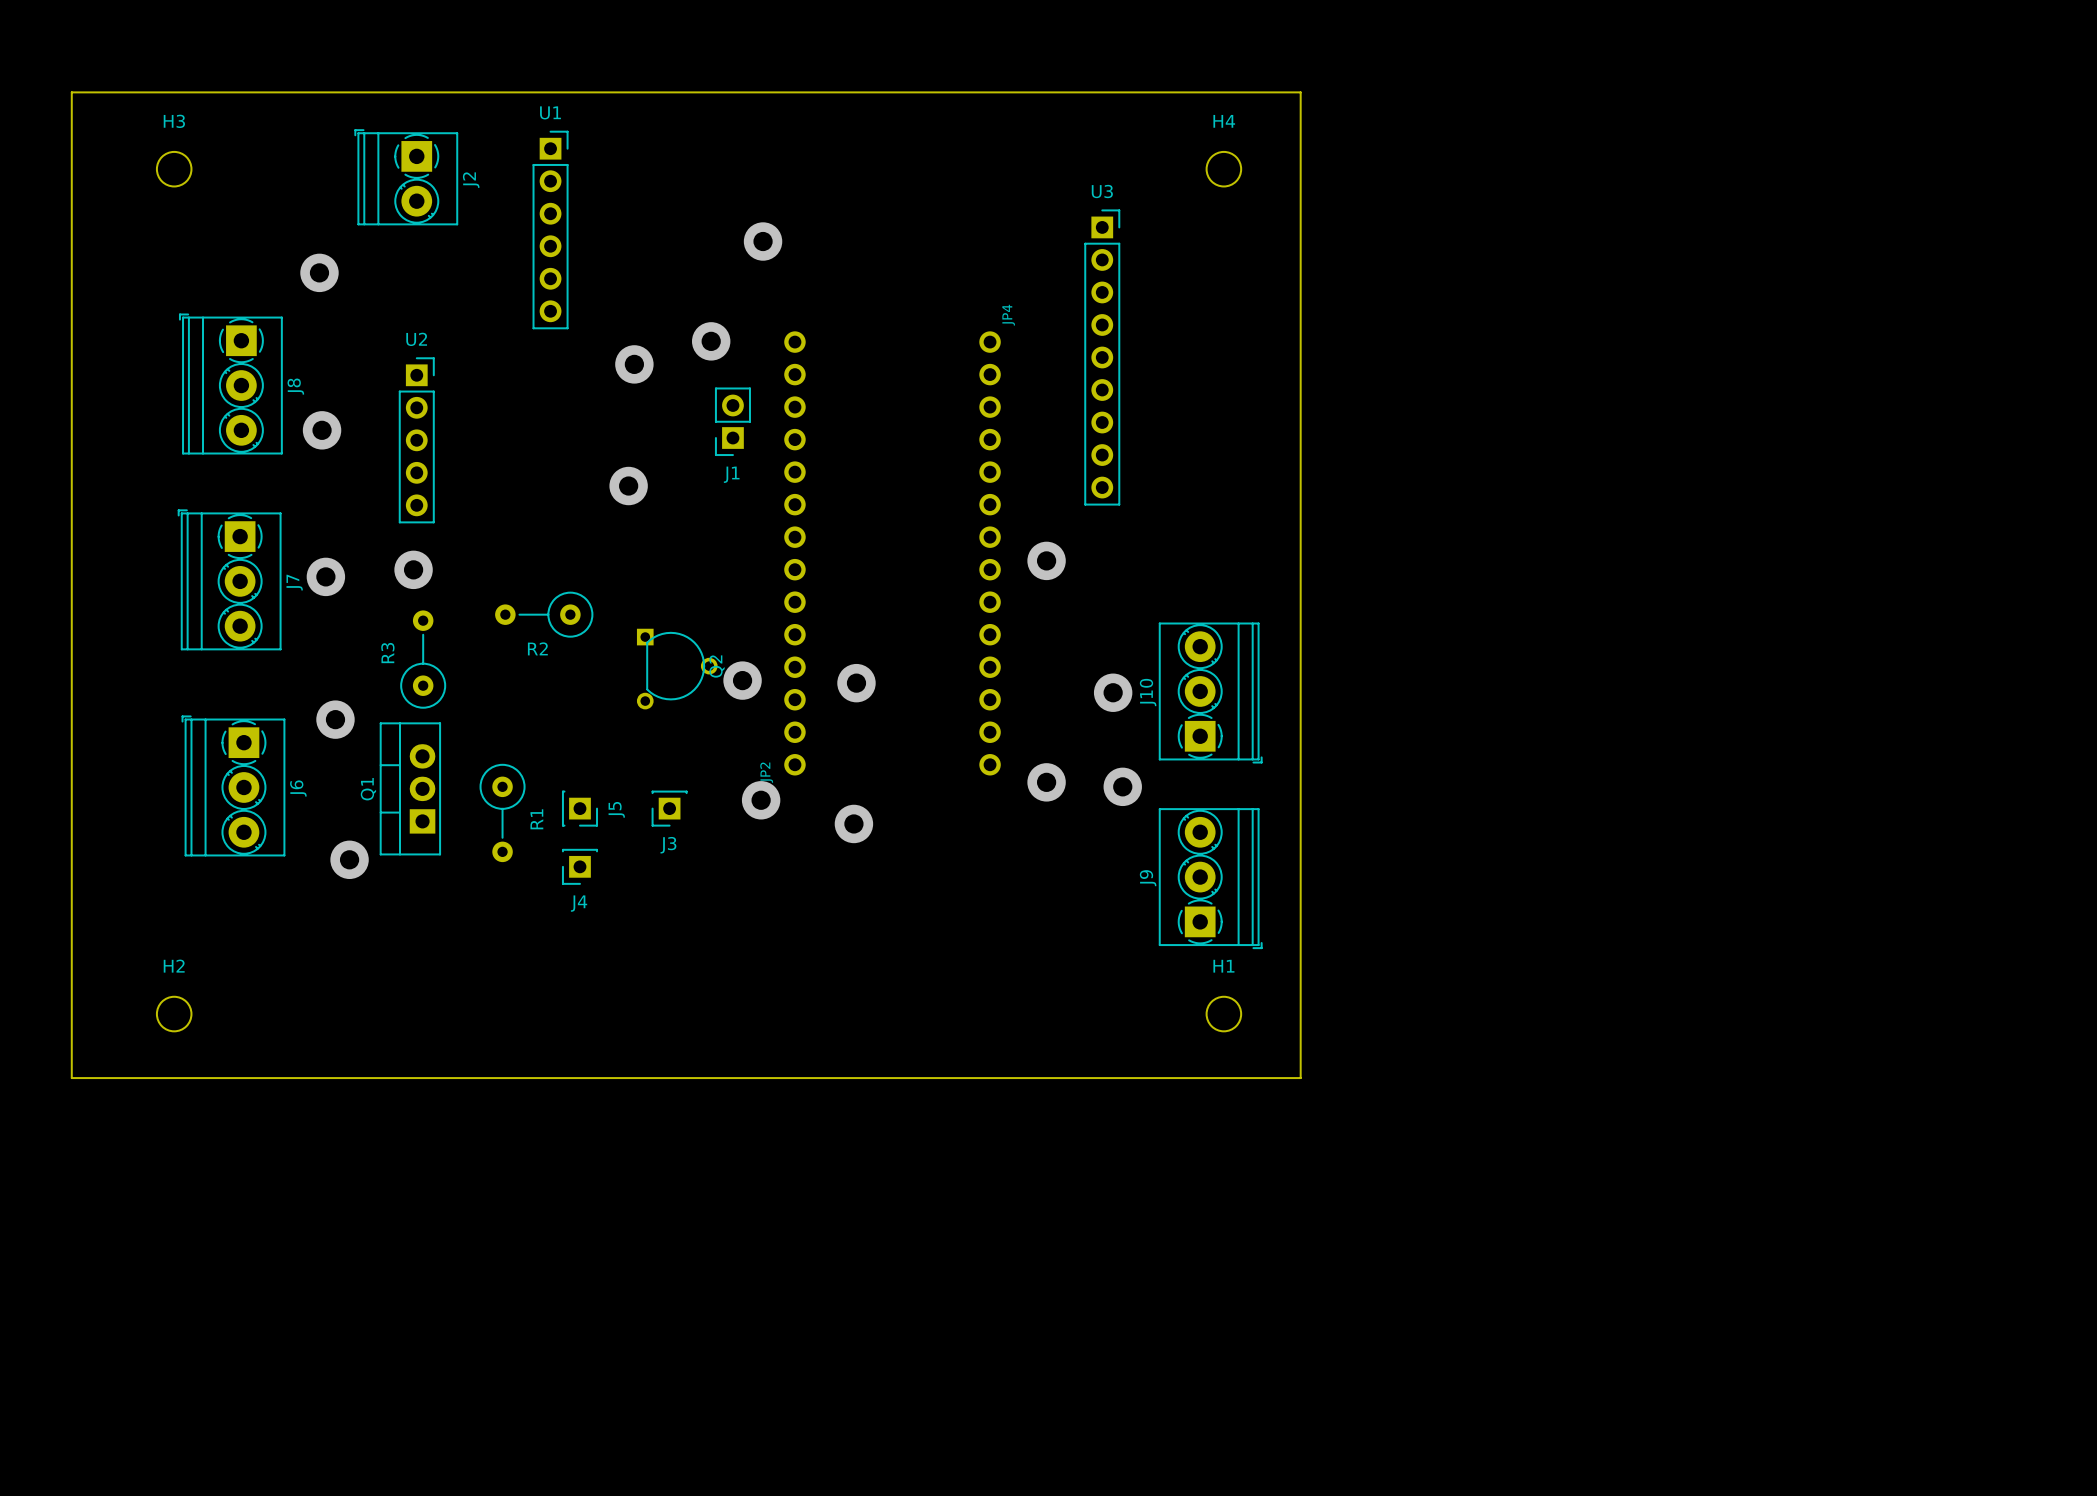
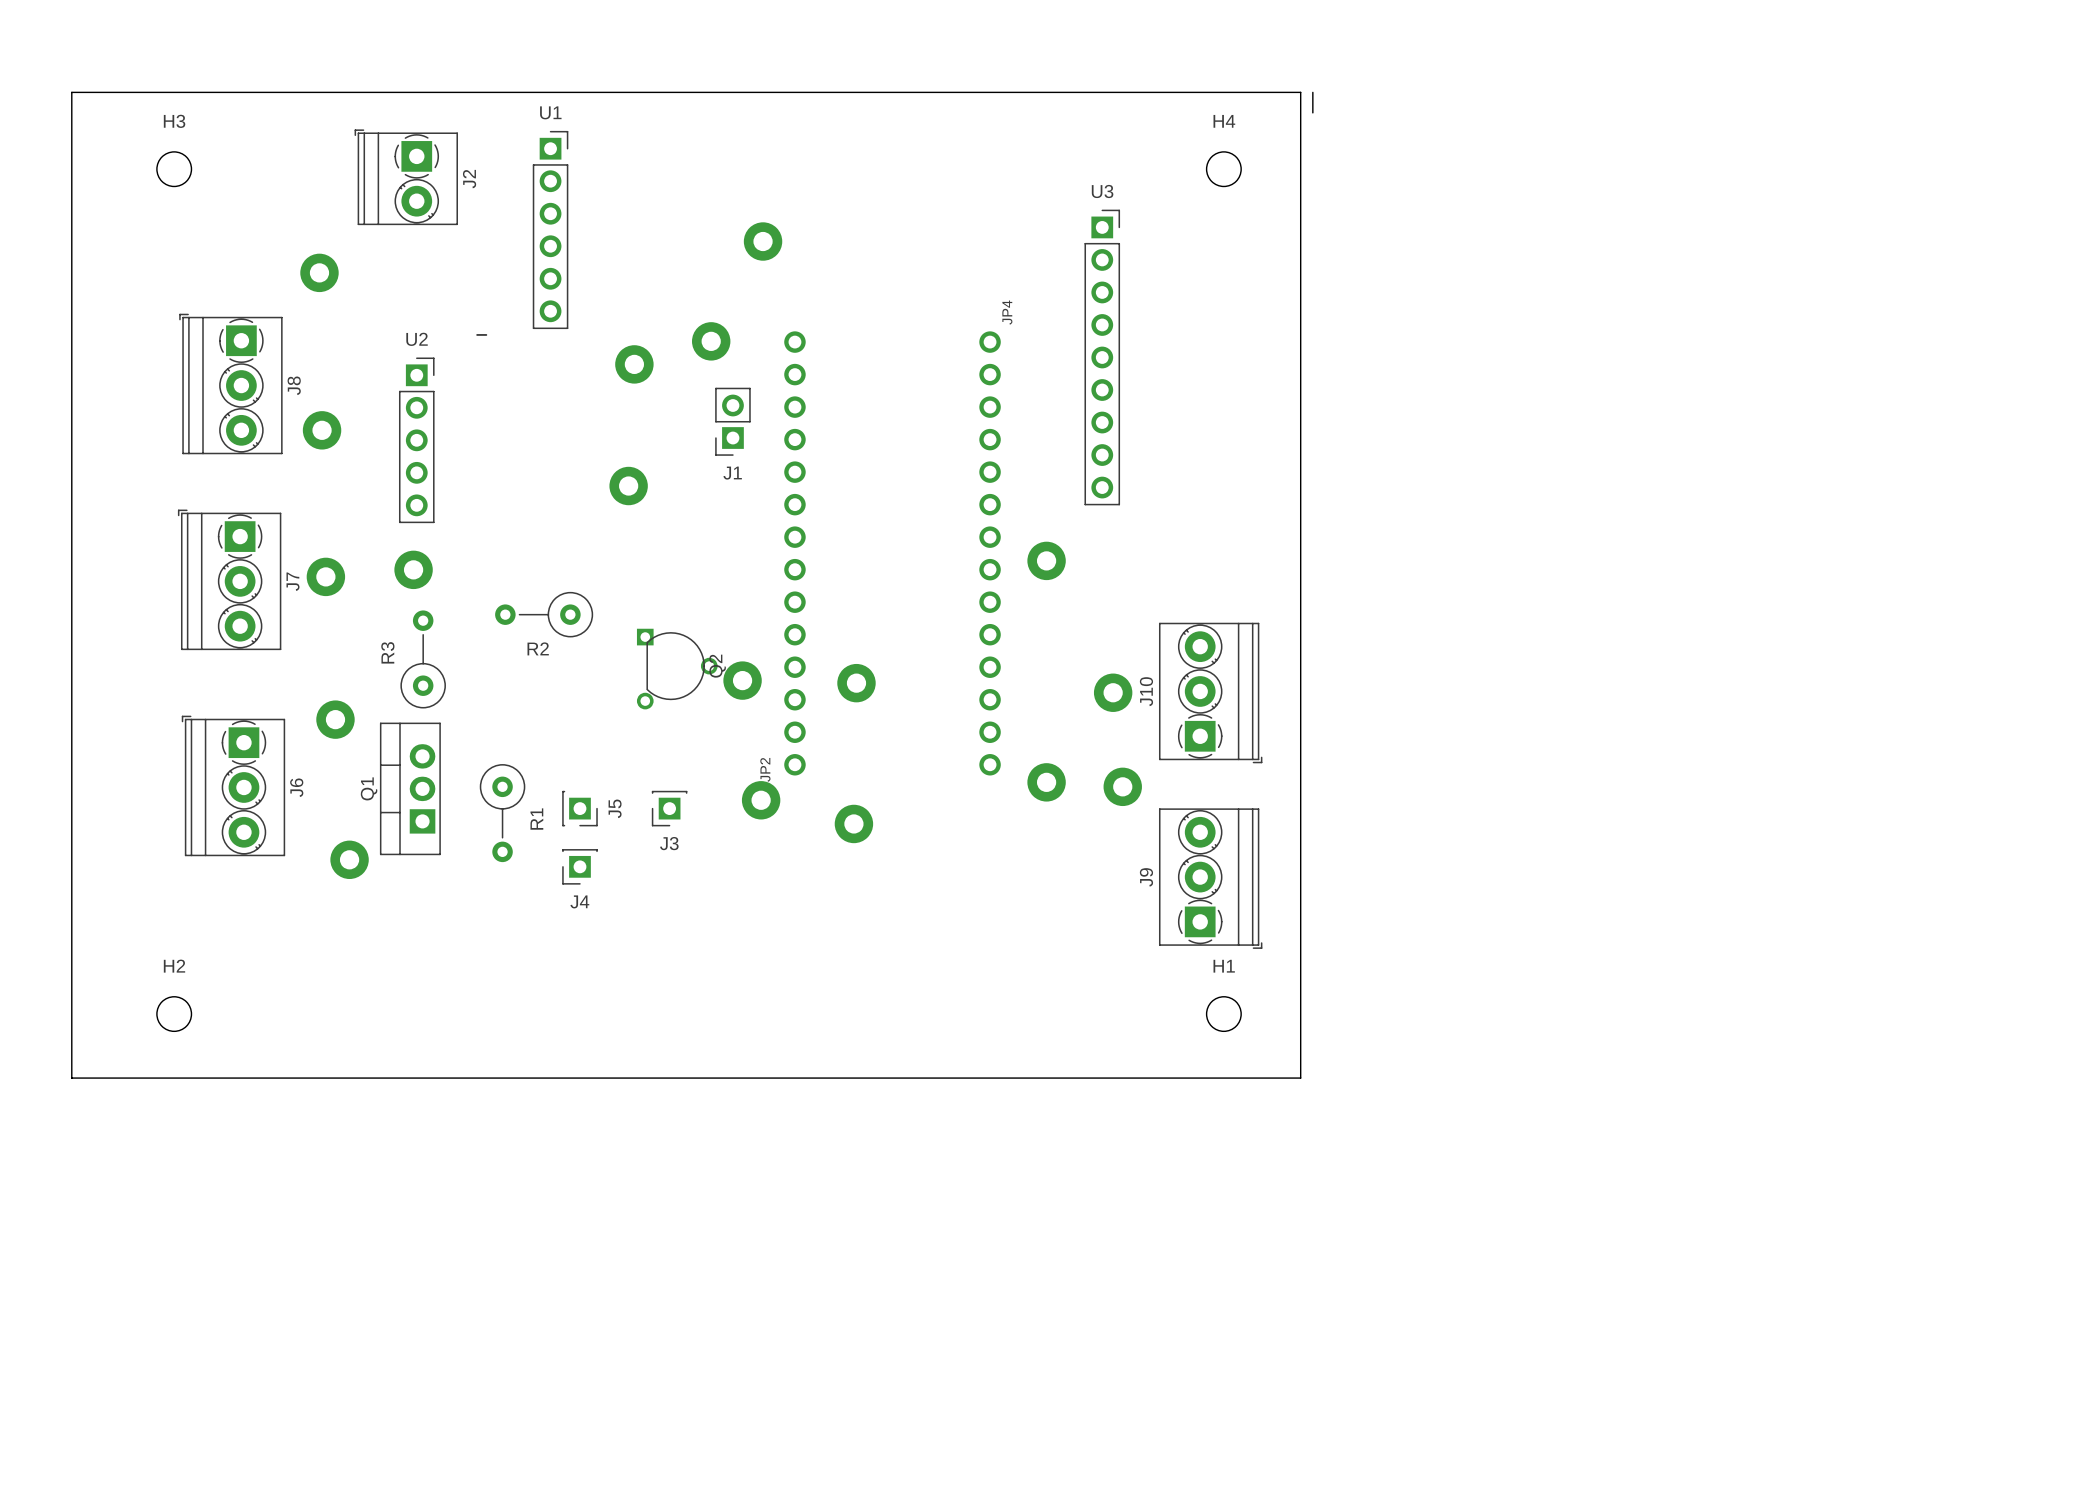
board edge: none -> (1312, 92) (1312, 112)
board edge: none -> (476, 334) (486, 334)

